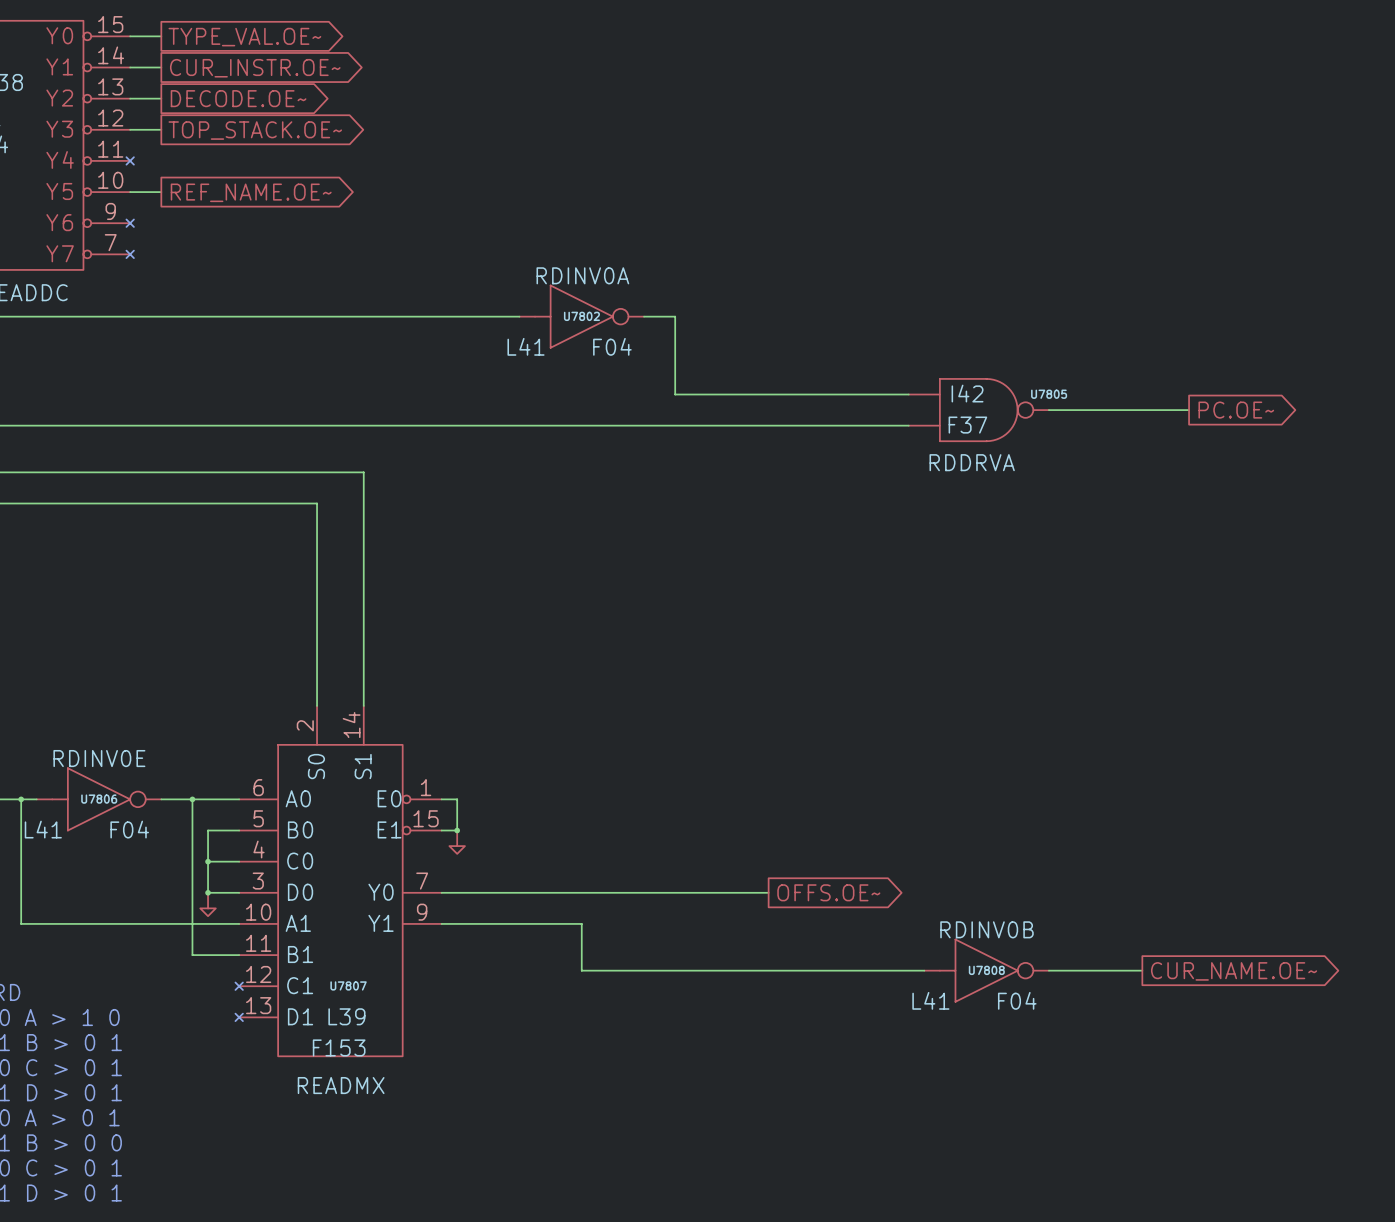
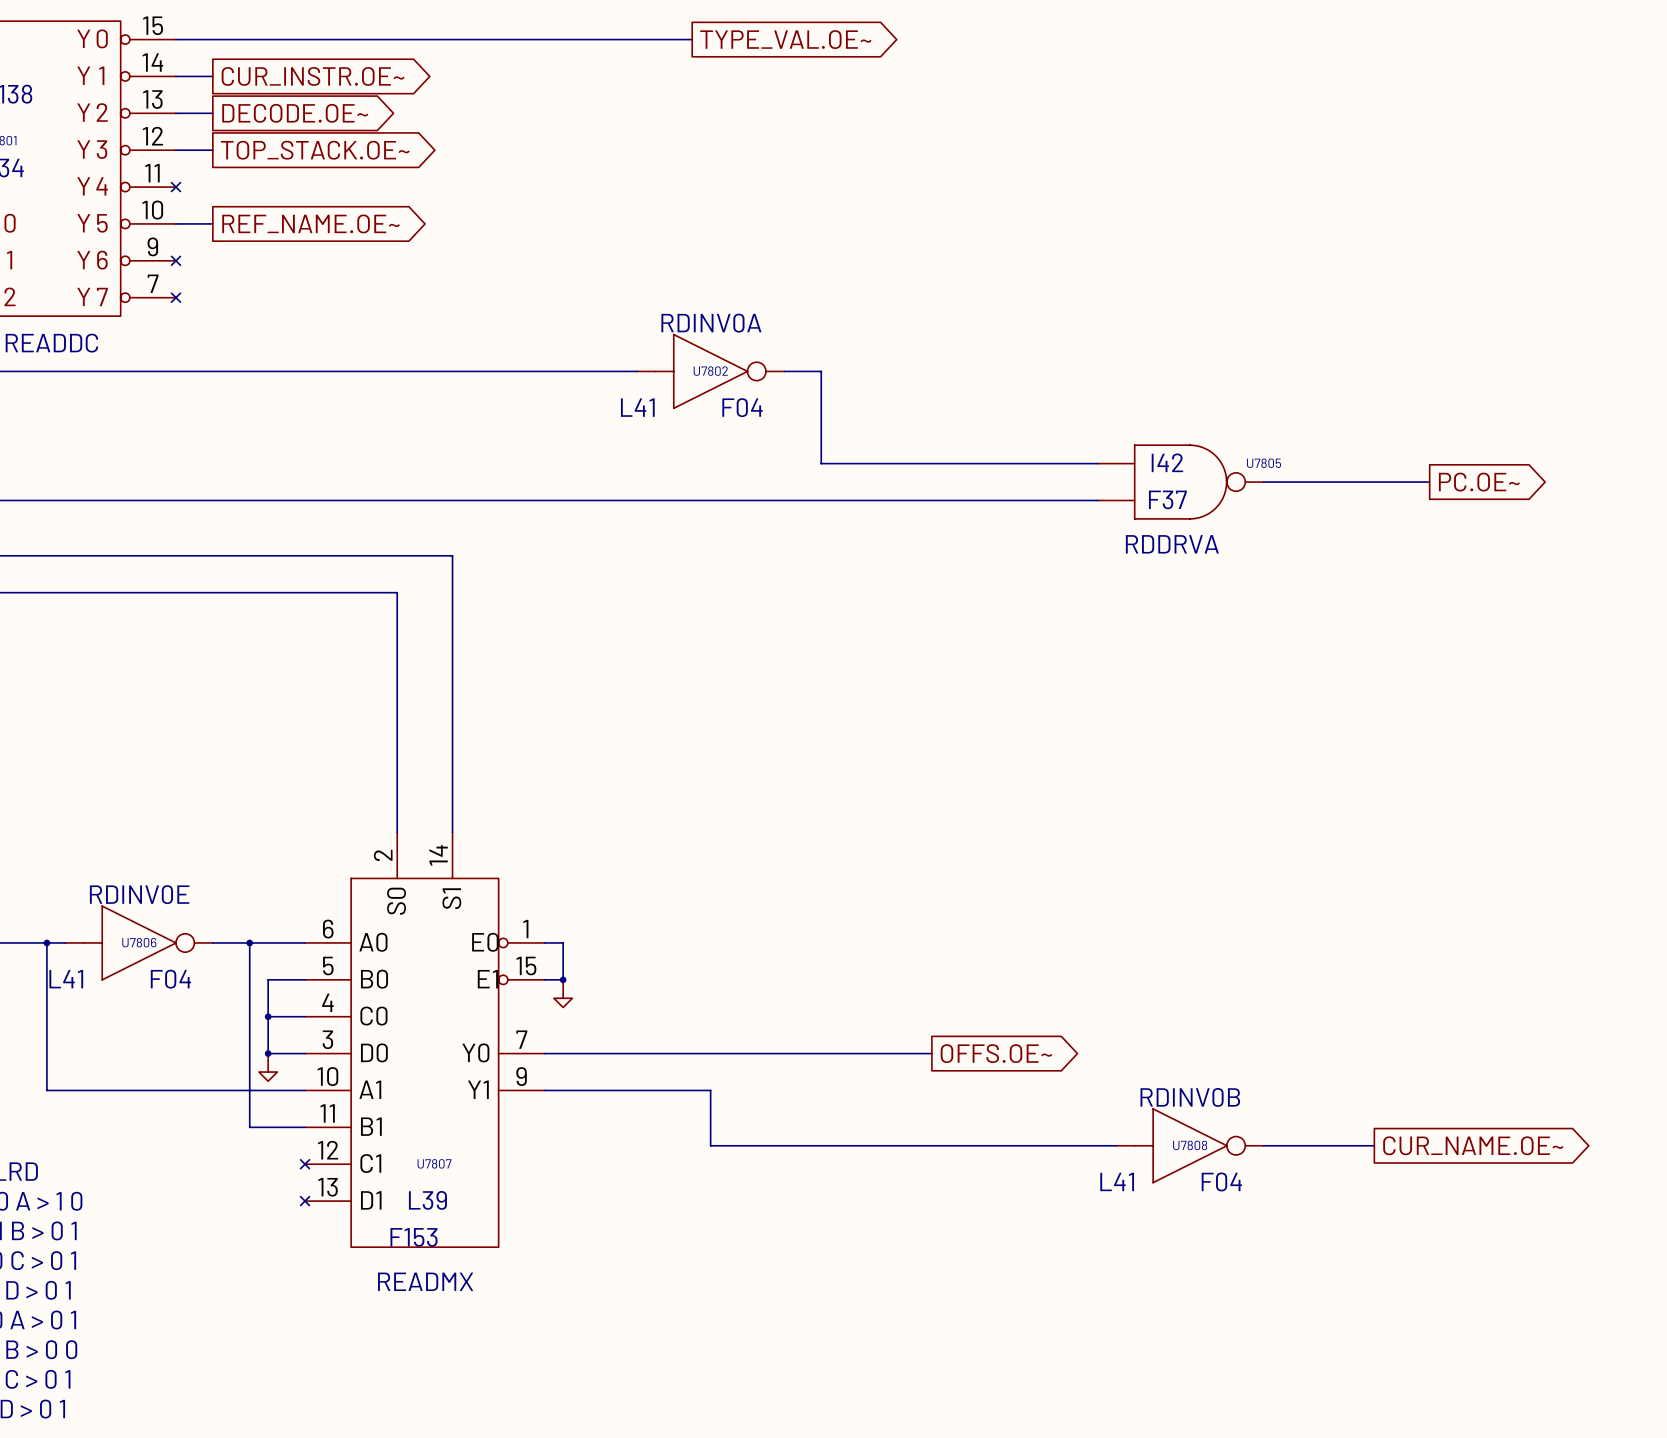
wire: none -> (212, 39) (692, 39)
global label: TYPE_VAL.OE~ (244, 37) -> none
global label: none -> TYPE_VAL.OE~ (785, 39)

